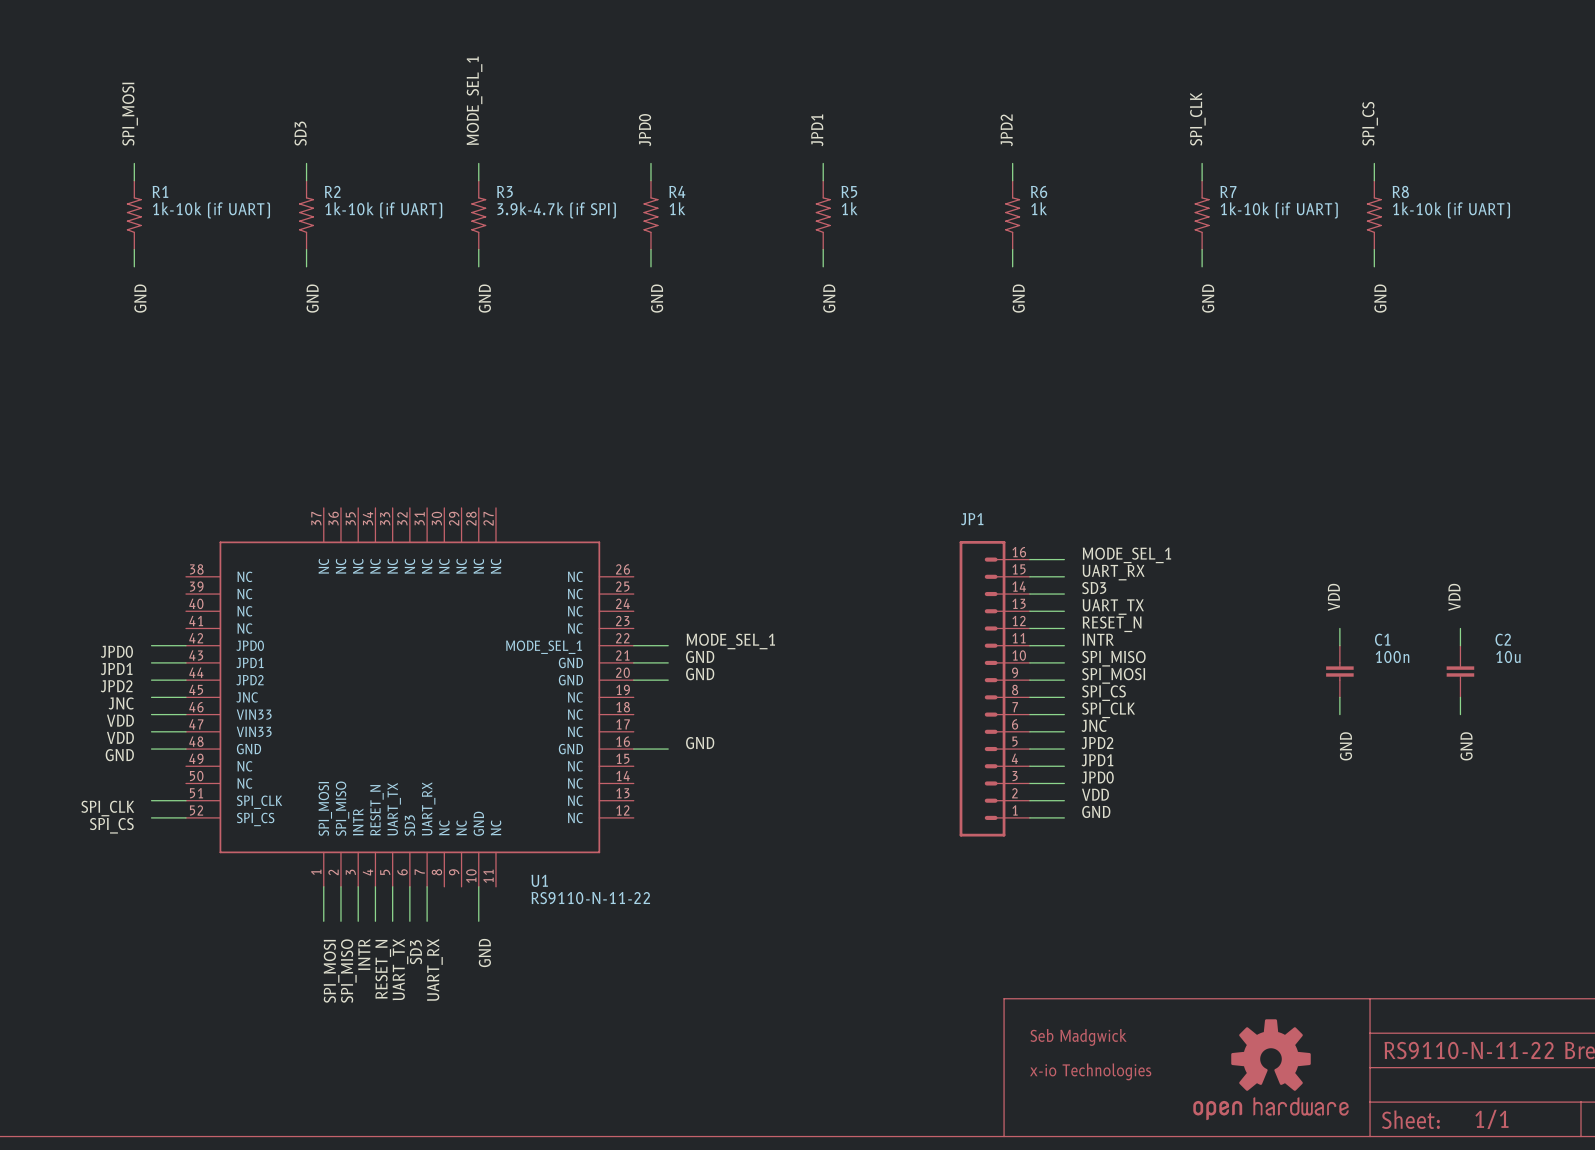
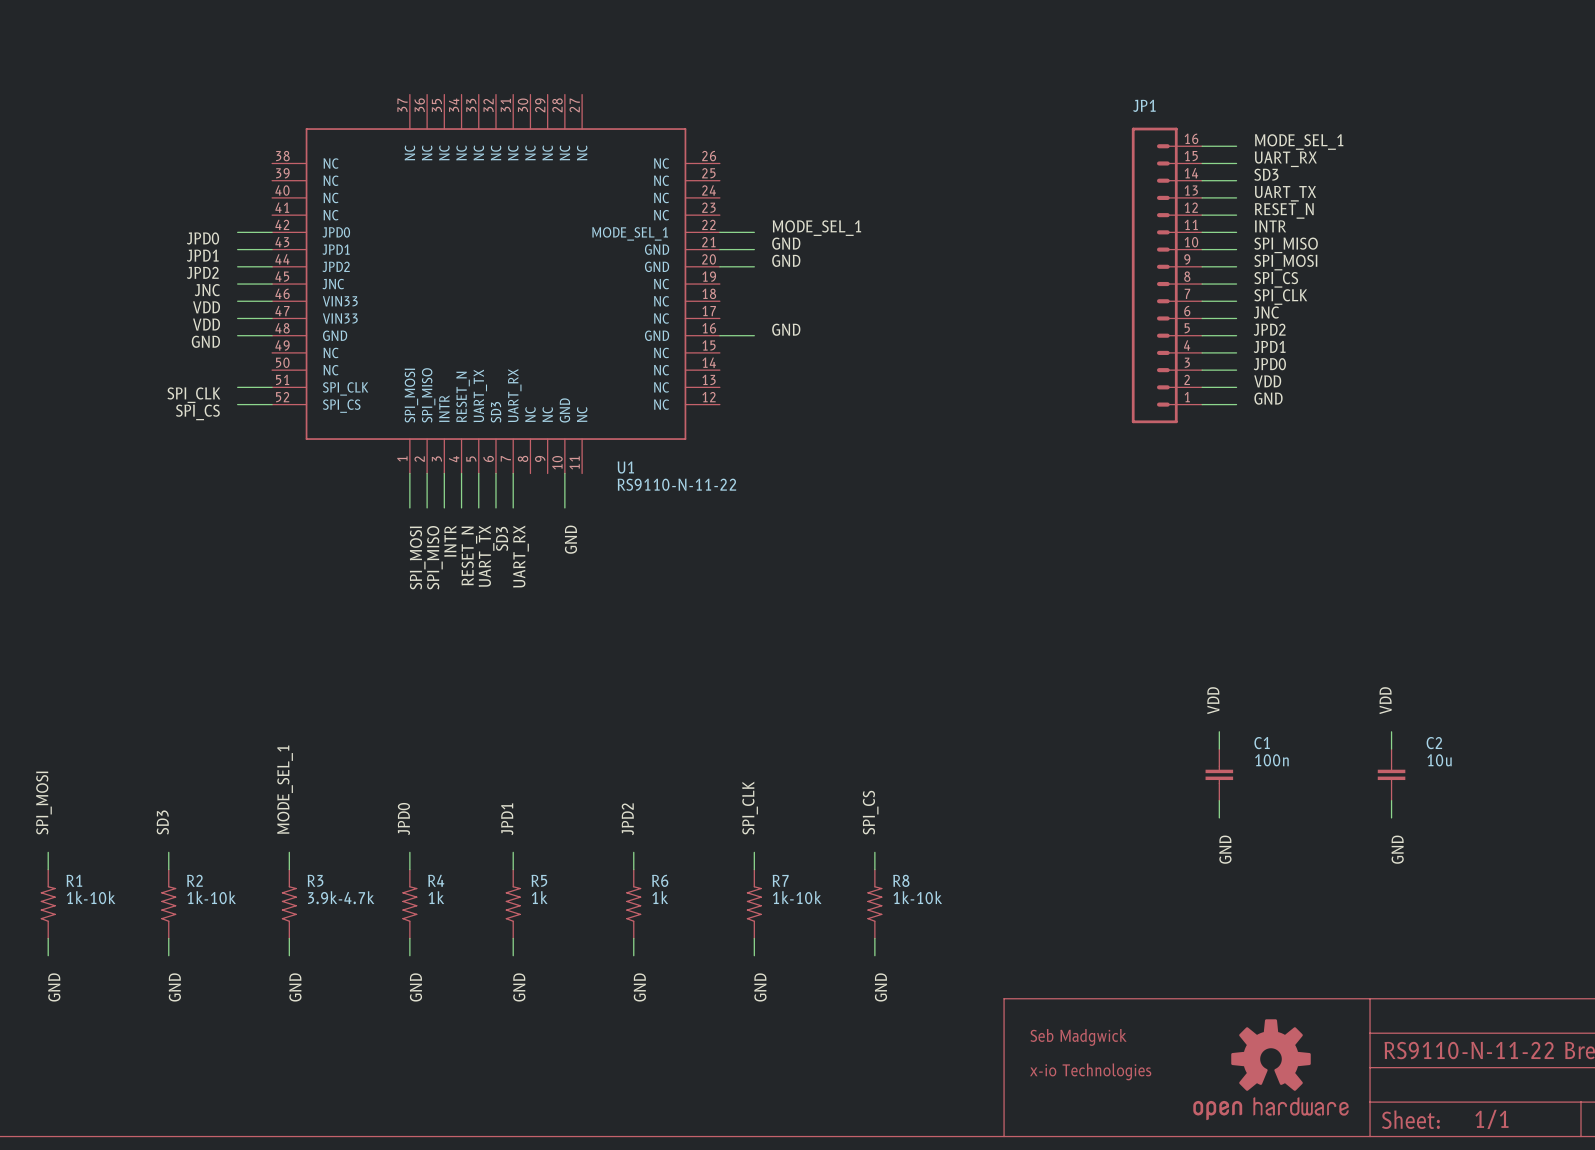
label: MODE_SEL_1 (474, 100) -> none
label: SPI_MOSI (130, 114) -> none
label rotation: 0° (1197, 119) -> 90° clockwise (1280, 297)
label position: SPI_CLK (1197, 119) -> SPI_CLK (1280, 297)
label: SPI_CS (1370, 123) -> none
label: JPD0 (645, 130) -> none
label: JPD1 (817, 130) -> none
label: JPD2 (1006, 130) -> none
label: SD3 (300, 133) -> none
label: none -> MODE_SEL_1 (1299, 142)
wire: none -> (1202, 146) (1236, 146)
label: none -> UART_RX (1285, 159)
wire: (134, 163) (134, 180) -> none
wire: (478, 163) (478, 180) -> none
wire: (650, 163) (650, 180) -> none
wire: (823, 163) (823, 180) -> none
wire: (1012, 163) (1012, 180) -> none
wire: (1202, 163) (1202, 180) -> (1202, 163) (1236, 163)
wire: (1374, 163) (1374, 180) -> none
label: none -> SD3 (1266, 174)
wire: none -> (1202, 180) (1236, 180)
label: none -> UART_TX (1285, 193)
wire: none -> (1202, 197) (1236, 197)
R1 value: 1k-10k (if UART) (211, 210) -> 1k-10k (91, 897)
R2 value: 1k-10k (if UART) (383, 210) -> 1k-10k (211, 897)
R3 value: 3.9k-4.7k (if SPI) (556, 210) -> 3.9k-4.7k (341, 897)
R7 value: 1k-10k (if UART) (1279, 210) -> 1k-10k (797, 897)
label: none -> RESET_N (1284, 210)
R8 value: 1k-10k (if UART) (1451, 210) -> 1k-10k (917, 897)
R1 position: (134, 215) -> (48, 904)
R2 position: (306, 215) -> (168, 904)
R3 position: (478, 215) -> (289, 904)
R4 position: (650, 215) -> (409, 904)
R5 position: (823, 215) -> (513, 904)
R6 position: (1012, 215) -> (633, 904)
wire: none -> (1202, 215) (1236, 215)
R7 position: (1202, 215) -> (754, 904)
R8 position: (1374, 215) -> (874, 904)
label: none -> INTR (1270, 226)
label: none -> MODE_SEL_1 (816, 228)
wire: none -> (237, 232) (272, 232)
wire: none -> (719, 232) (754, 232)
wire: none -> (1202, 232) (1236, 232)
label: none -> JPD0 (202, 238)
label: none -> GND (786, 243)
label: none -> SPI_MISO (1286, 245)
wire: (134, 249) (134, 266) -> none
wire: none -> (237, 249) (272, 249)
wire: (478, 249) (478, 266) -> none
wire: (650, 249) (650, 266) -> none
wire: none -> (719, 249) (754, 249)
wire: (823, 249) (823, 266) -> none
wire: (1012, 249) (1012, 266) -> none
wire: (1202, 249) (1202, 266) -> (1202, 249) (1236, 249)
wire: (1374, 249) (1374, 266) -> none
label: none -> JPD1 (202, 255)
label: none -> GND (786, 260)
label: none -> SPI_MOSI (1285, 262)
wire: none -> (237, 266) (272, 266)
wire: none -> (719, 266) (754, 266)
wire: none -> (1202, 266) (1236, 266)
label: none -> JPD2 (202, 272)
label: none -> SPI_CS (1276, 279)
wire: none -> (237, 284) (272, 284)
wire: none -> (1202, 284) (1236, 284)
label: none -> JNC (207, 290)
label: GND (140, 298) -> none
label: GND (312, 298) -> none
label: GND (484, 298) -> none
label: GND (657, 298) -> none
label: GND (829, 298) -> none
label: GND (1018, 298) -> none
label: GND (1208, 298) -> none
label: GND (1380, 298) -> none
wire: none -> (237, 301) (272, 301)
wire: none -> (1202, 301) (1236, 301)
label: none -> VDD (206, 307)
label: none -> JNC (1266, 312)
wire: none -> (237, 318) (272, 318)
wire: none -> (1202, 318) (1236, 318)
label: none -> VDD (206, 324)
label: none -> GND (786, 329)
label: none -> JPD2 (1269, 329)
wire: none -> (237, 335) (272, 335)
wire: none -> (719, 335) (754, 335)
wire: none -> (1202, 335) (1236, 335)
label: none -> GND (205, 341)
label: none -> JPD1 (1269, 346)
wire: none -> (1202, 352) (1236, 352)
label: none -> JPD0 (1269, 364)
wire: none -> (1202, 370) (1236, 370)
label: none -> VDD (1267, 381)
wire: none -> (237, 387) (272, 387)
wire: none -> (1202, 387) (1236, 387)
label: none -> SPI_CLK (193, 395)
label: none -> GND (1268, 398)
wire: none -> (237, 404) (272, 404)
wire: none -> (1202, 404) (1236, 404)
label: none -> SPI_CS (197, 412)
wire: none -> (409, 473) (409, 507)
wire: none -> (427, 473) (427, 507)
wire: none -> (444, 473) (444, 507)
wire: none -> (461, 473) (461, 507)
wire: none -> (478, 473) (478, 507)
wire: none -> (495, 473) (495, 507)
wire: none -> (513, 473) (513, 507)
wire: none -> (564, 473) (564, 507)
label: none -> SD3 (502, 538)
label: none -> GND (570, 539)
label: none -> INTR (450, 541)
label: MODE_SEL_1 (1126, 555) -> none
label: none -> RESET_N (469, 556)
label: none -> UART_TX (486, 556)
label: none -> UART_RX (521, 556)
label: none -> SPI_MISO (434, 557)
label: none -> SPI_MOSI (417, 558)
wire: (1029, 559) (1064, 559) -> none
label: UART_RX (1113, 572) -> none
wire: (1029, 576) (1064, 576) -> none
label: SD3 (1094, 588) -> none
wire: (1029, 594) (1064, 594) -> none
label: VDD (1333, 597) -> none
label: VDD (1454, 597) -> none
label: UART_TX (1113, 607) -> none
wire: (1029, 611) (1064, 611) -> none
label: RESET_N (1112, 624) -> none
wire: (1029, 628) (1064, 628) -> none
wire: (1339, 628) (1339, 645) -> (1391, 731) (1391, 749)
wire: (1460, 628) (1460, 645) -> none
label: INTR (1098, 639) -> none
label: MODE_SEL_1 (730, 641) -> none
wire: (151, 645) (185, 645) -> none
wire: (633, 645) (668, 645) -> none
wire: (1029, 645) (1064, 645) -> none
label: JPD0 (116, 651) -> none
label: GND (700, 656) -> none
label: SPI_MISO (1113, 658) -> none
wire: (151, 662) (185, 662) -> none
wire: (633, 662) (668, 662) -> none
wire: (1029, 662) (1064, 662) -> none
label: JPD1 (116, 669) -> none
C1 position: (1339, 671) -> (1219, 774)
C2 position: (1460, 671) -> (1391, 774)
label: GND (700, 674) -> none
label: SPI_MOSI (1113, 675) -> none
wire: (151, 680) (185, 680) -> none
wire: (633, 680) (668, 680) -> none
wire: (1029, 680) (1064, 680) -> none
label: JPD2 (116, 686) -> none
JP1 position: (994, 688) -> (1166, 275)
label: SPI_CS (1104, 693) -> none
wire: (151, 697) (185, 697) -> none
U1 position: (409, 697) -> (495, 284)
wire: (1029, 697) (1064, 697) -> none
wire: (1339, 697) (1339, 714) -> (1391, 800) (1391, 817)
wire: (1460, 697) (1460, 714) -> none
label: none -> VDD (1213, 700)
label: none -> VDD (1385, 700)
label: JNC (121, 703) -> none
label: SPI_CLK (1108, 710) -> none
wire: (151, 714) (185, 714) -> none
wire: (1029, 714) (1064, 714) -> none
label: VDD (120, 720) -> none
label: JNC (1094, 725) -> none
wire: (151, 731) (185, 731) -> none
wire: (1029, 731) (1064, 731) -> none
wire: none -> (1219, 731) (1219, 749)
label: VDD (120, 737) -> none
label: GND (700, 743) -> none
label: JPD2 (1097, 743) -> none
label: GND (1345, 746) -> none
label: GND (1466, 746) -> none
wire: (151, 749) (185, 749) -> none
wire: (633, 749) (668, 749) -> none
wire: (1029, 749) (1064, 749) -> none
label: GND (119, 755) -> none
label: JPD1 (1097, 760) -> none
wire: (1029, 766) (1064, 766) -> none
label: JPD0 (1097, 777) -> none
wire: (1029, 783) (1064, 783) -> none
label: none -> MODE_SEL_1 (285, 789)
label: VDD (1095, 794) -> none
wire: (151, 800) (185, 800) -> none
wire: (1029, 800) (1064, 800) -> none
wire: none -> (1219, 800) (1219, 817)
label: none -> SPI_MOSI (43, 803)
label: SPI_CLK (107, 808) -> none
label: none -> SPI_CLK (750, 808)
label: GND (1096, 811) -> none
label: none -> SPI_CS (870, 812)
wire: (151, 817) (185, 817) -> none
wire: (1029, 817) (1064, 817) -> none
label: none -> JPD0 (403, 819)
label: none -> JPD1 (507, 819)
label: none -> JPD2 (627, 819)
label: none -> SD3 (162, 822)
label: SPI_CS (111, 825) -> none
label: none -> GND (1225, 849)
label: none -> GND (1397, 849)
wire: none -> (48, 852) (48, 869)
wire: none -> (168, 852) (168, 869)
wire: none -> (289, 852) (289, 869)
wire: none -> (513, 852) (513, 869)
wire: none -> (633, 852) (633, 869)
wire: none -> (754, 852) (754, 869)
wire: none -> (874, 852) (874, 869)
wire: (323, 886) (323, 921) -> none
wire: (340, 886) (340, 921) -> none
wire: (358, 886) (358, 921) -> none
wire: (375, 886) (375, 921) -> none
wire: (392, 886) (392, 921) -> none
wire: (409, 886) (409, 921) -> none
wire: (427, 886) (427, 921) -> none
wire: (478, 886) (478, 921) -> none
wire: none -> (48, 938) (48, 955)
wire: none -> (168, 938) (168, 955)
wire: none -> (289, 938) (289, 955)
wire: none -> (409, 938) (409, 955)
wire: none -> (513, 938) (513, 955)
wire: none -> (633, 938) (633, 955)
wire: none -> (754, 938) (754, 955)
wire: none -> (874, 938) (874, 955)
label: SD3 (415, 952) -> none
label: GND (484, 953) -> none
label: INTR (364, 954) -> none
label: RESET_N (383, 969) -> none
label: UART_TX (400, 969) -> none
label: UART_RX (434, 969) -> none
label: SPI_MOSI (331, 971) -> none
label: SPI_MISO (348, 971) -> none
label: none -> GND (54, 987)
label: none -> GND (174, 987)
label: none -> GND (295, 987)
label: none -> GND (415, 987)
label: none -> GND (519, 987)
label: none -> GND (639, 987)
label: none -> GND (760, 987)
label: none -> GND (880, 987)

